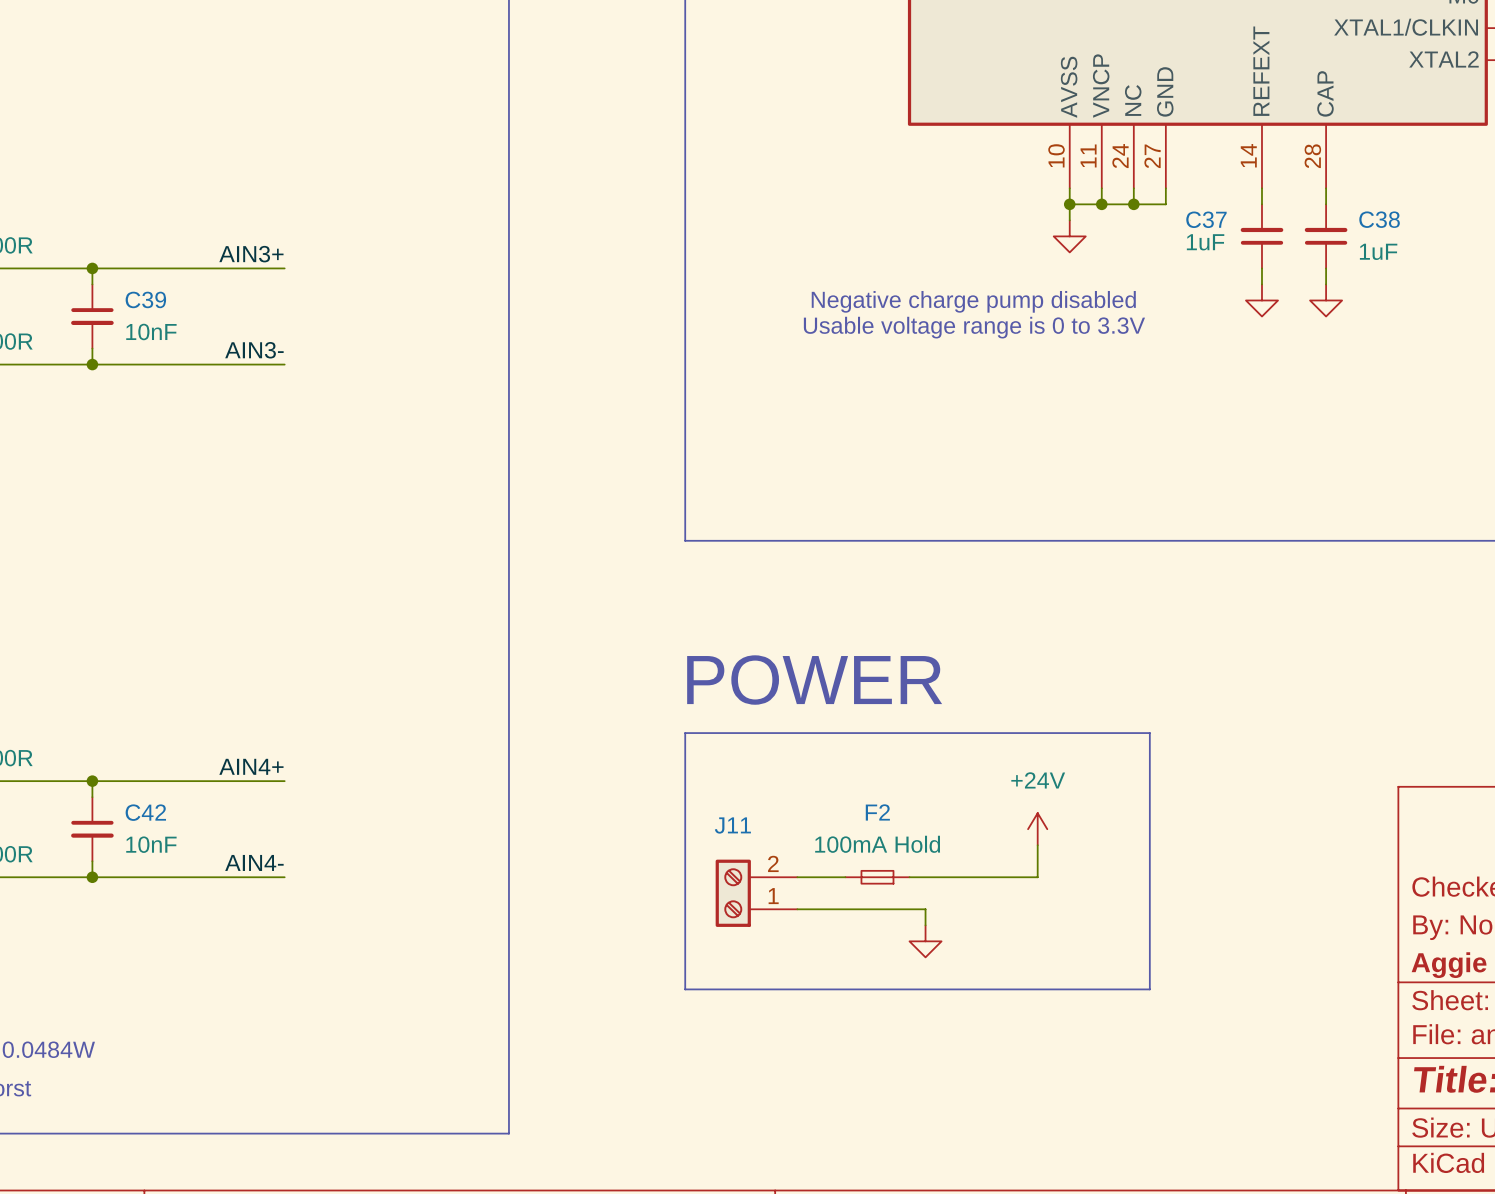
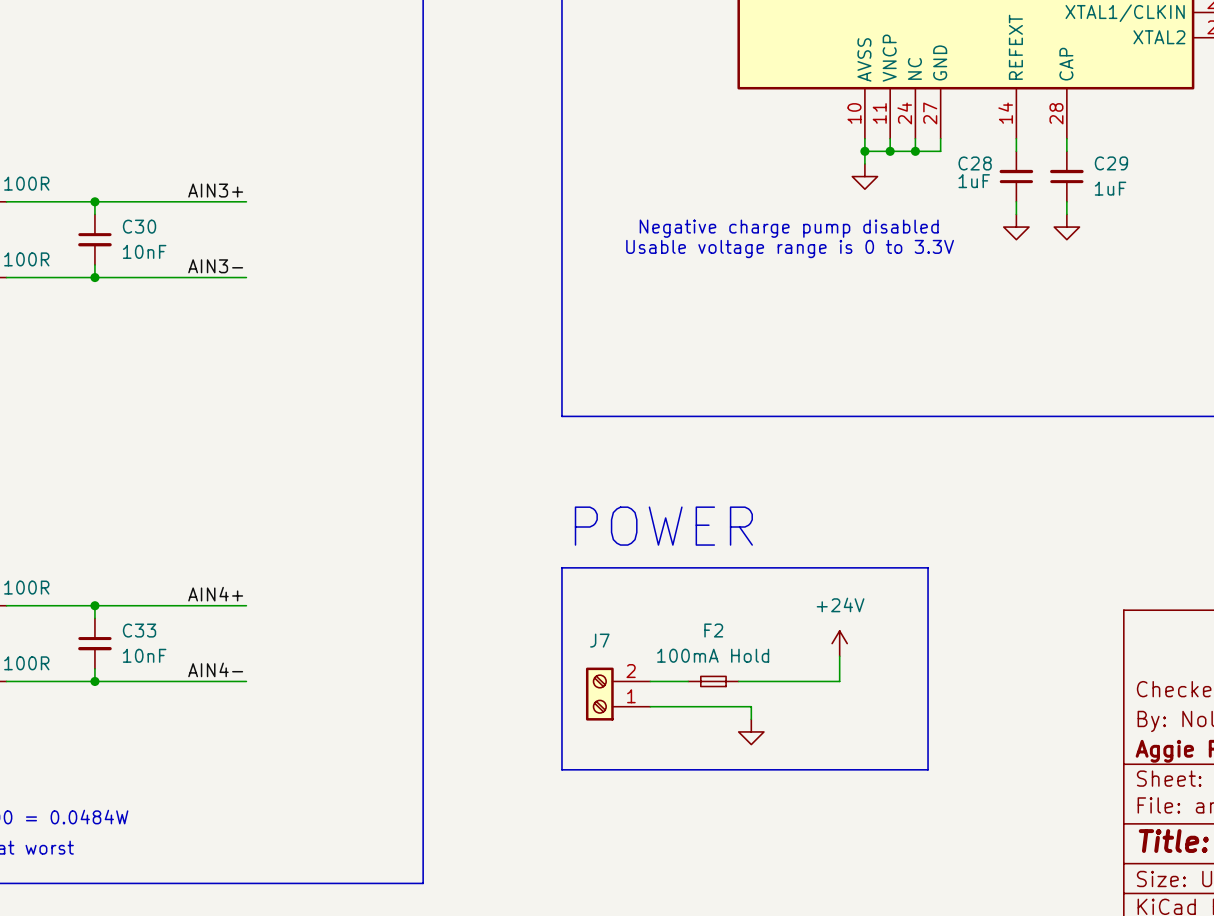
C37 name: C37 (1206, 219) -> C28 (975, 163)
C38 name: C38 (1379, 219) -> C29 (1111, 163)
C39 name: C39 (145, 299) -> C30 (139, 226)
C42 name: C42 (145, 812) -> C33 (139, 630)
J11 name: J11 (732, 825) -> J7 (599, 640)

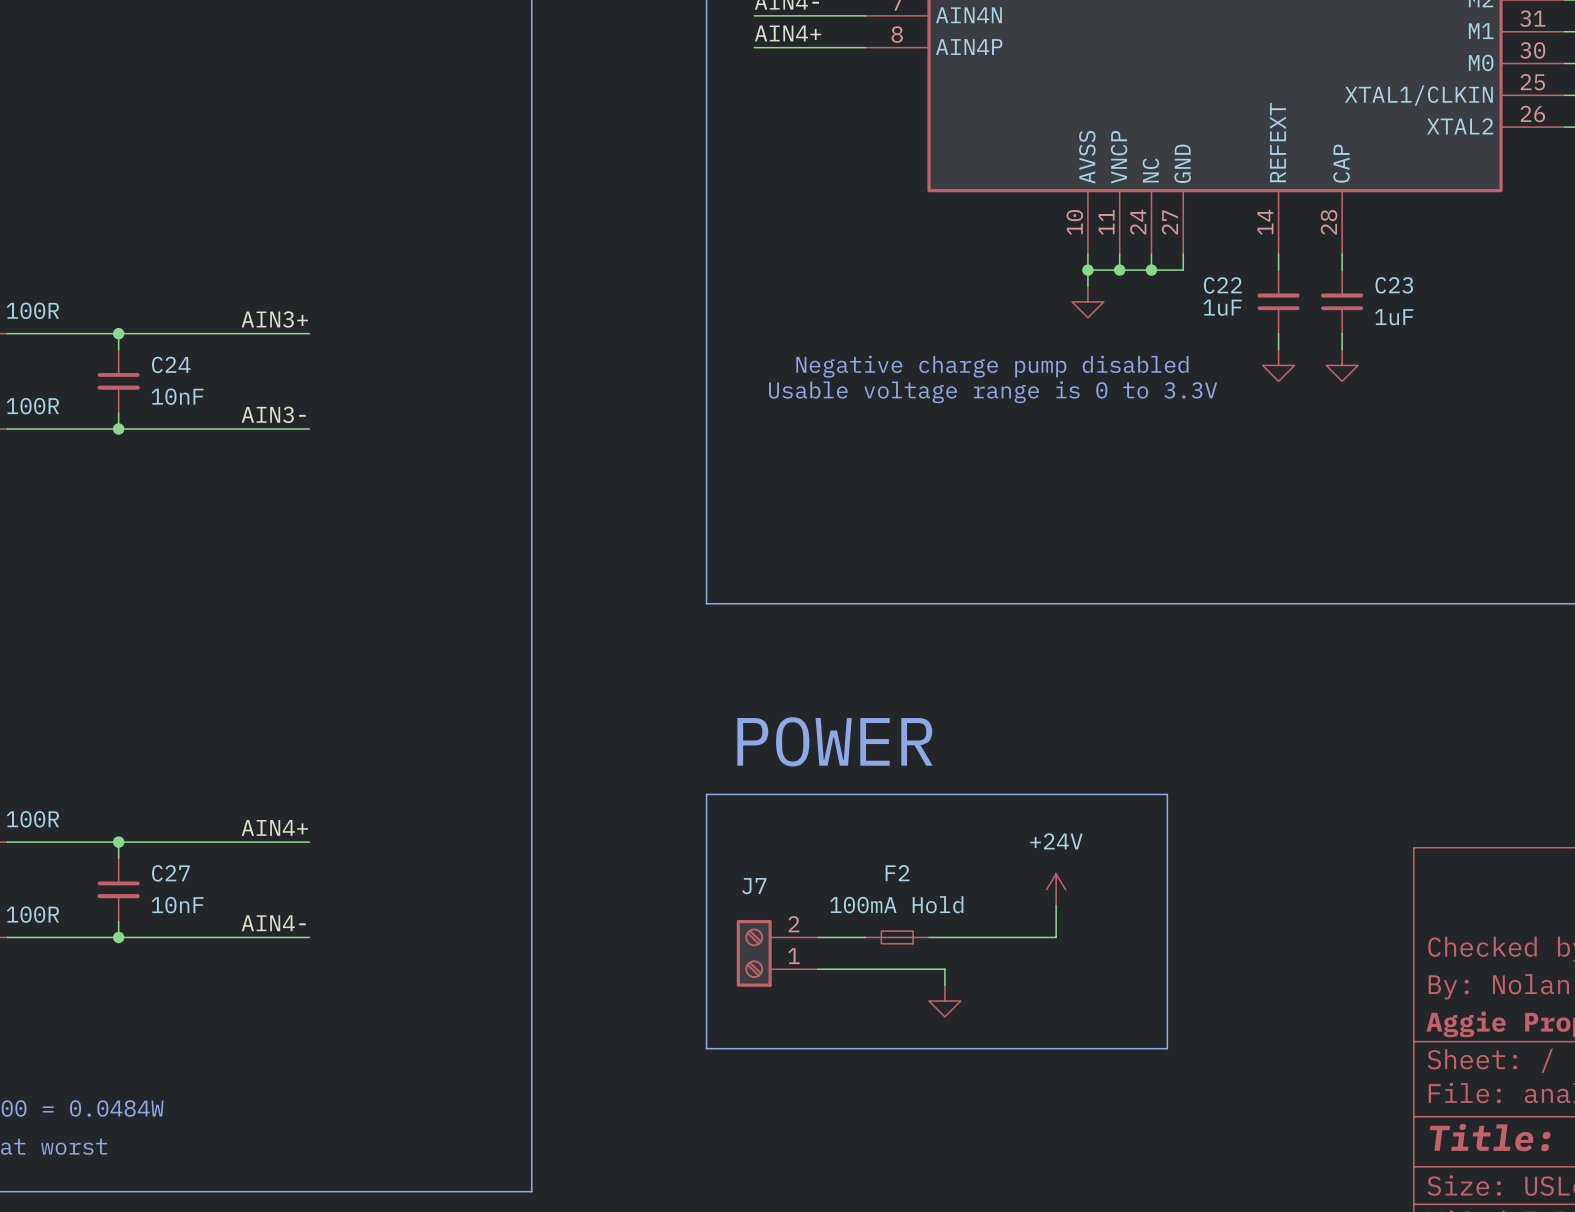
C28 name: C28 (975, 163) -> C22 (1222, 285)
C29 name: C29 (1111, 163) -> C23 (1394, 285)
C30 name: C30 (139, 226) -> C24 (171, 364)
C33 name: C33 (139, 630) -> C27 (170, 873)

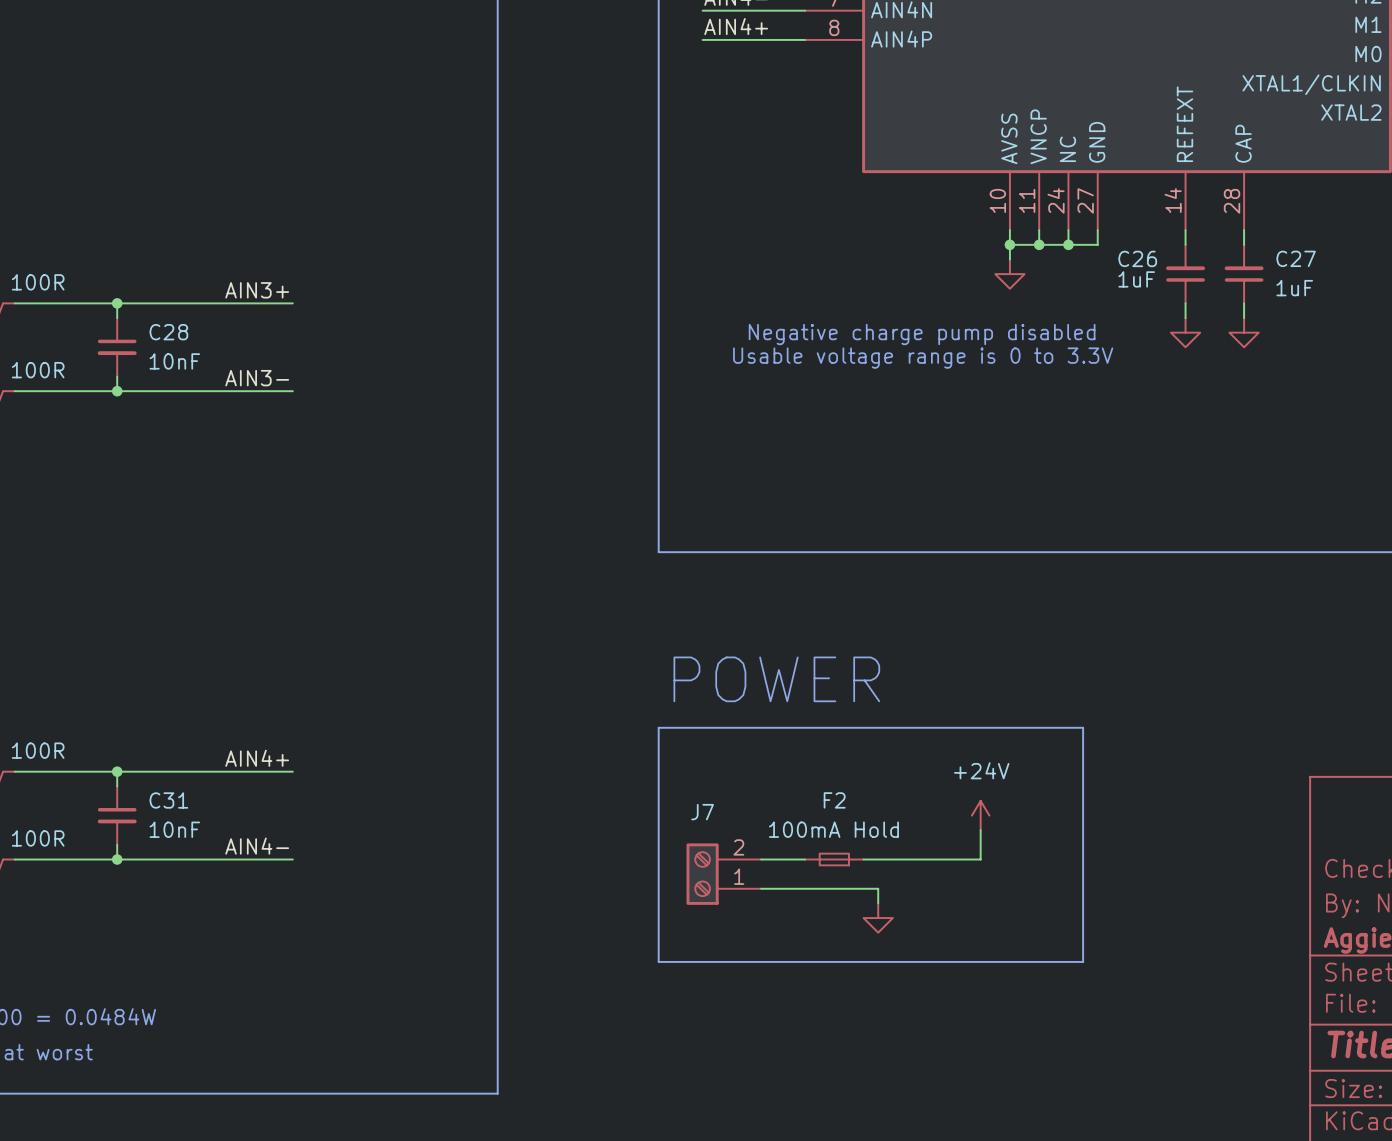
C22 name: C22 (1222, 285) -> C26 (1137, 258)
C23 name: C23 (1394, 285) -> C27 (1296, 258)
C24 name: C24 (171, 364) -> C28 (168, 332)
C27 name: C27 (170, 873) -> C31 (168, 800)

